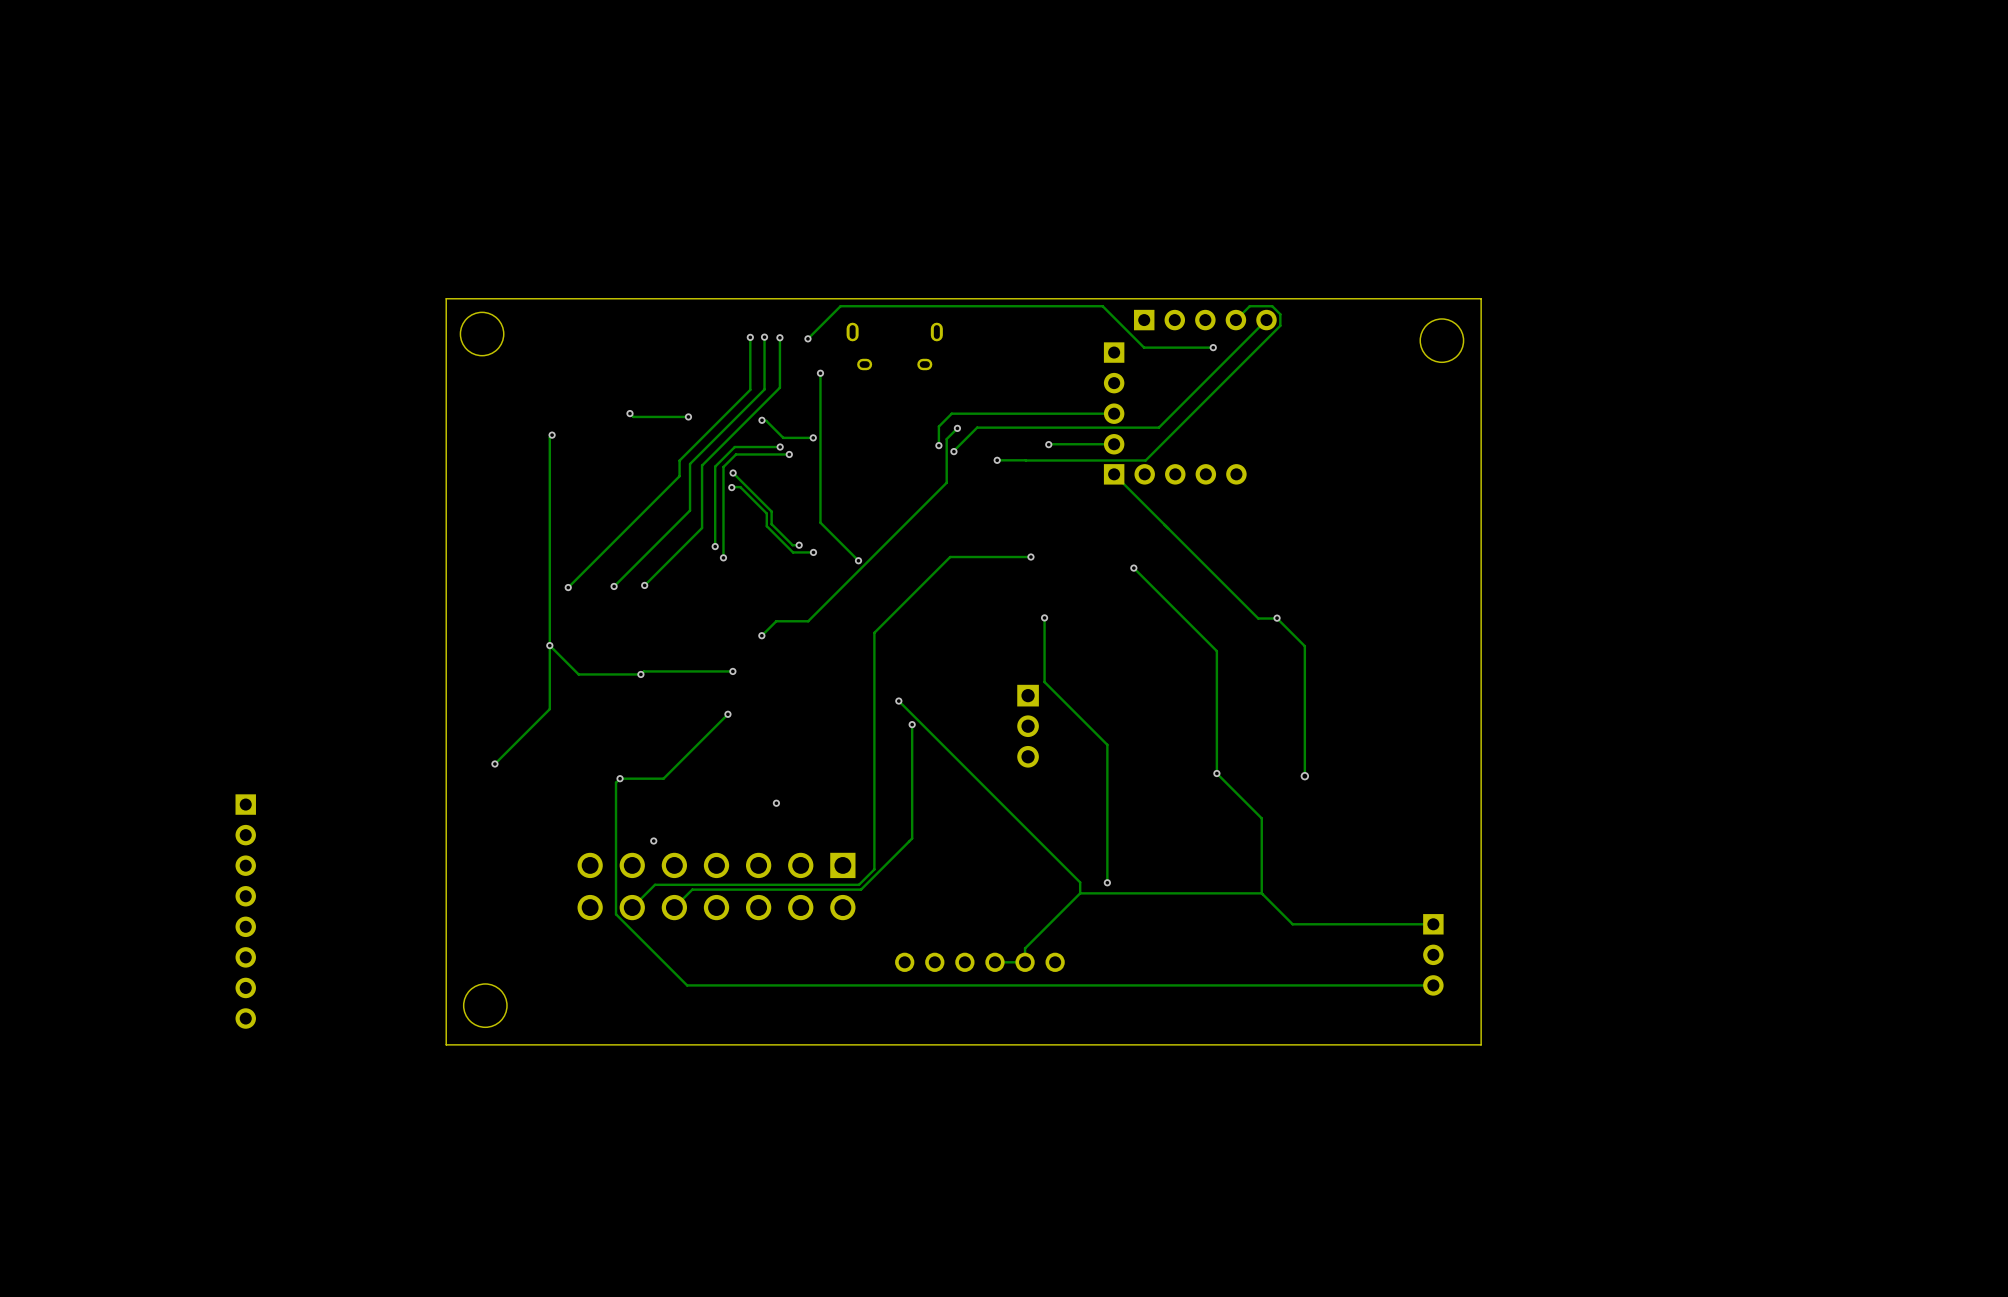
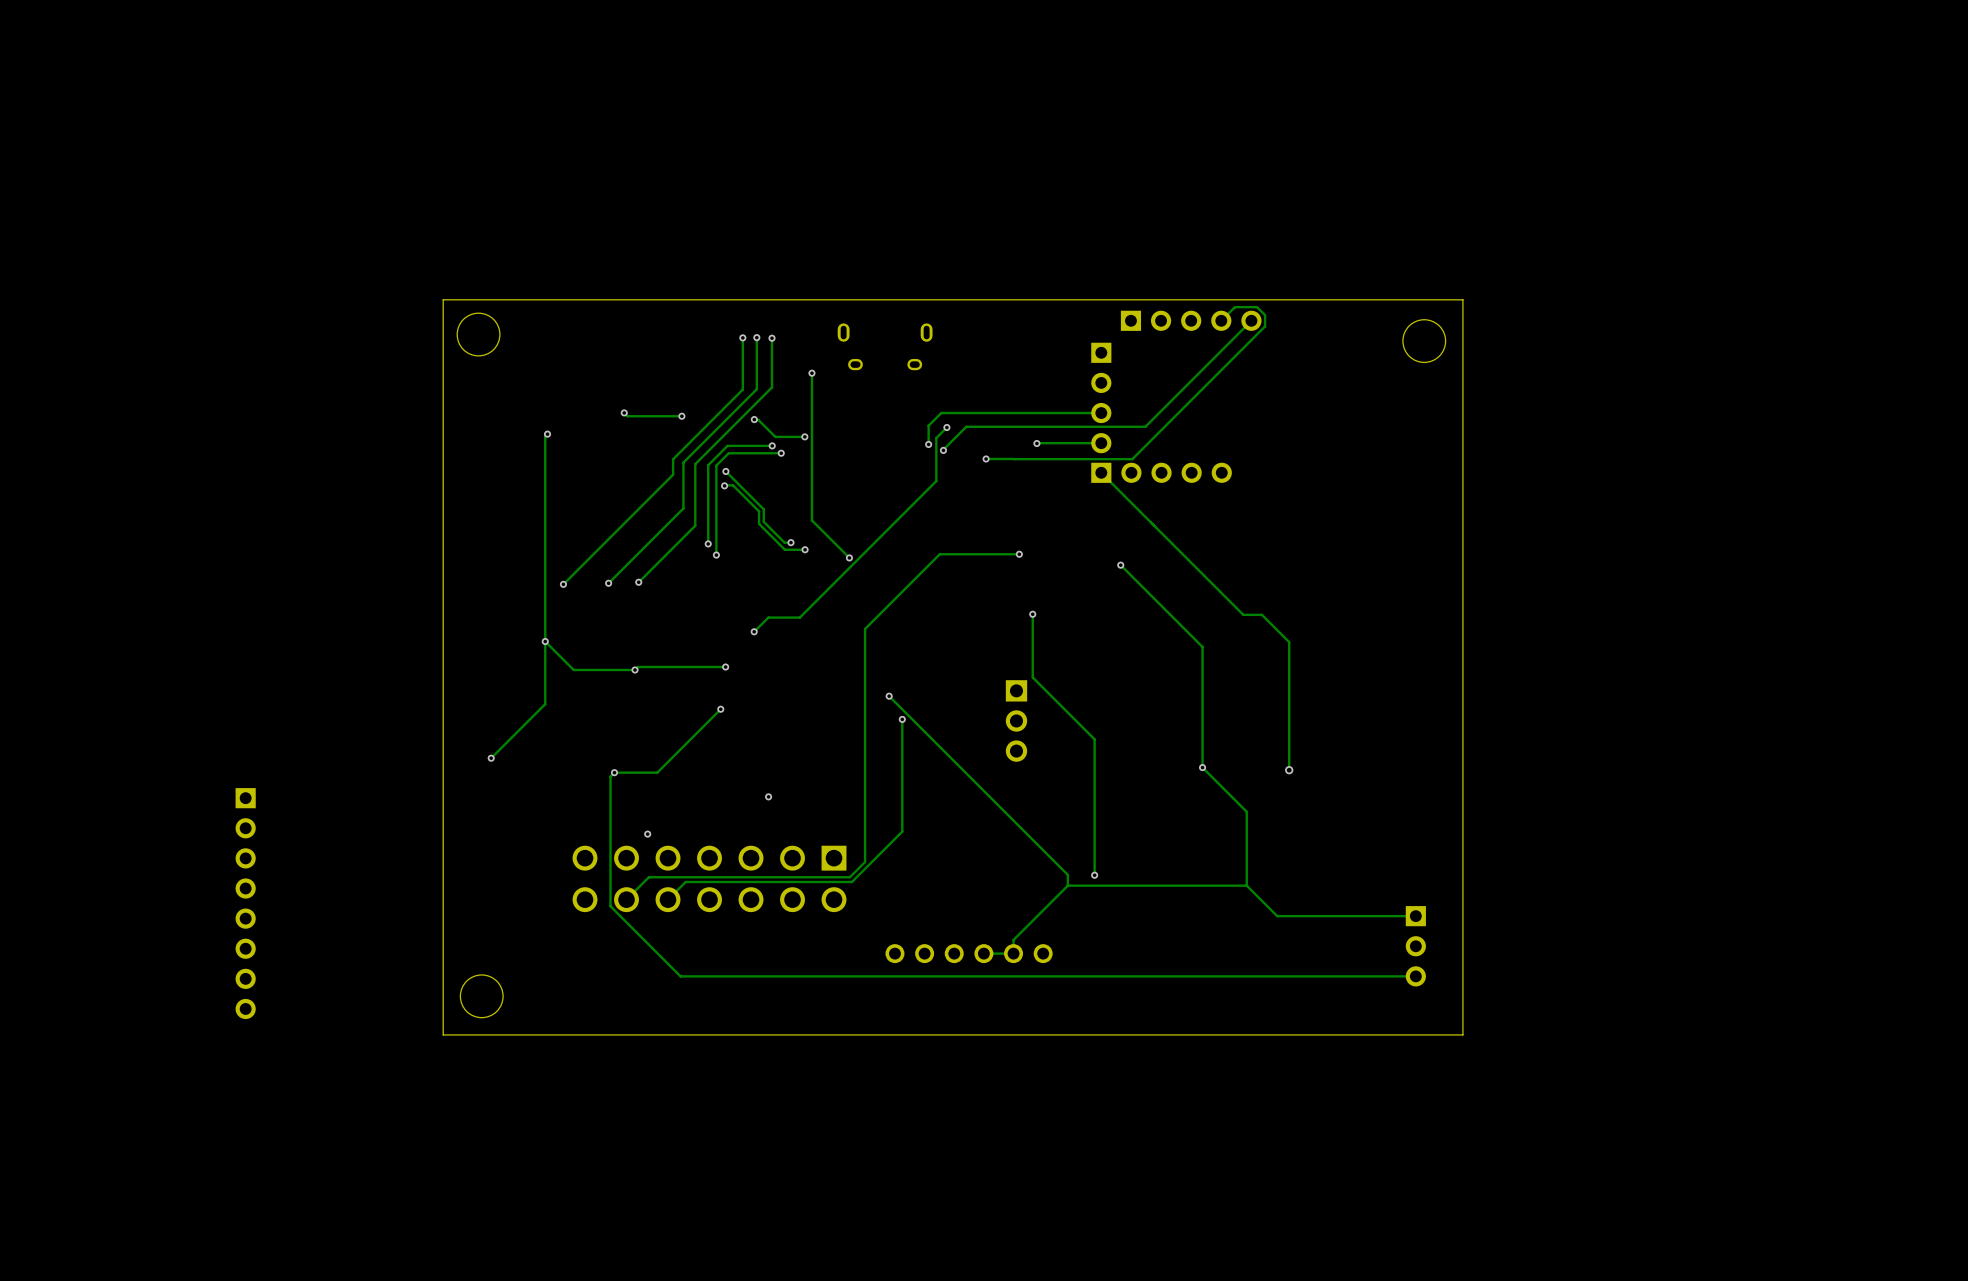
track: (807, 338) (840, 306) (1102, 306) (1144, 347) (1213, 347) -> none
via: (807, 338) -> none
via: (1213, 347) -> none
via: (1277, 618) -> none

